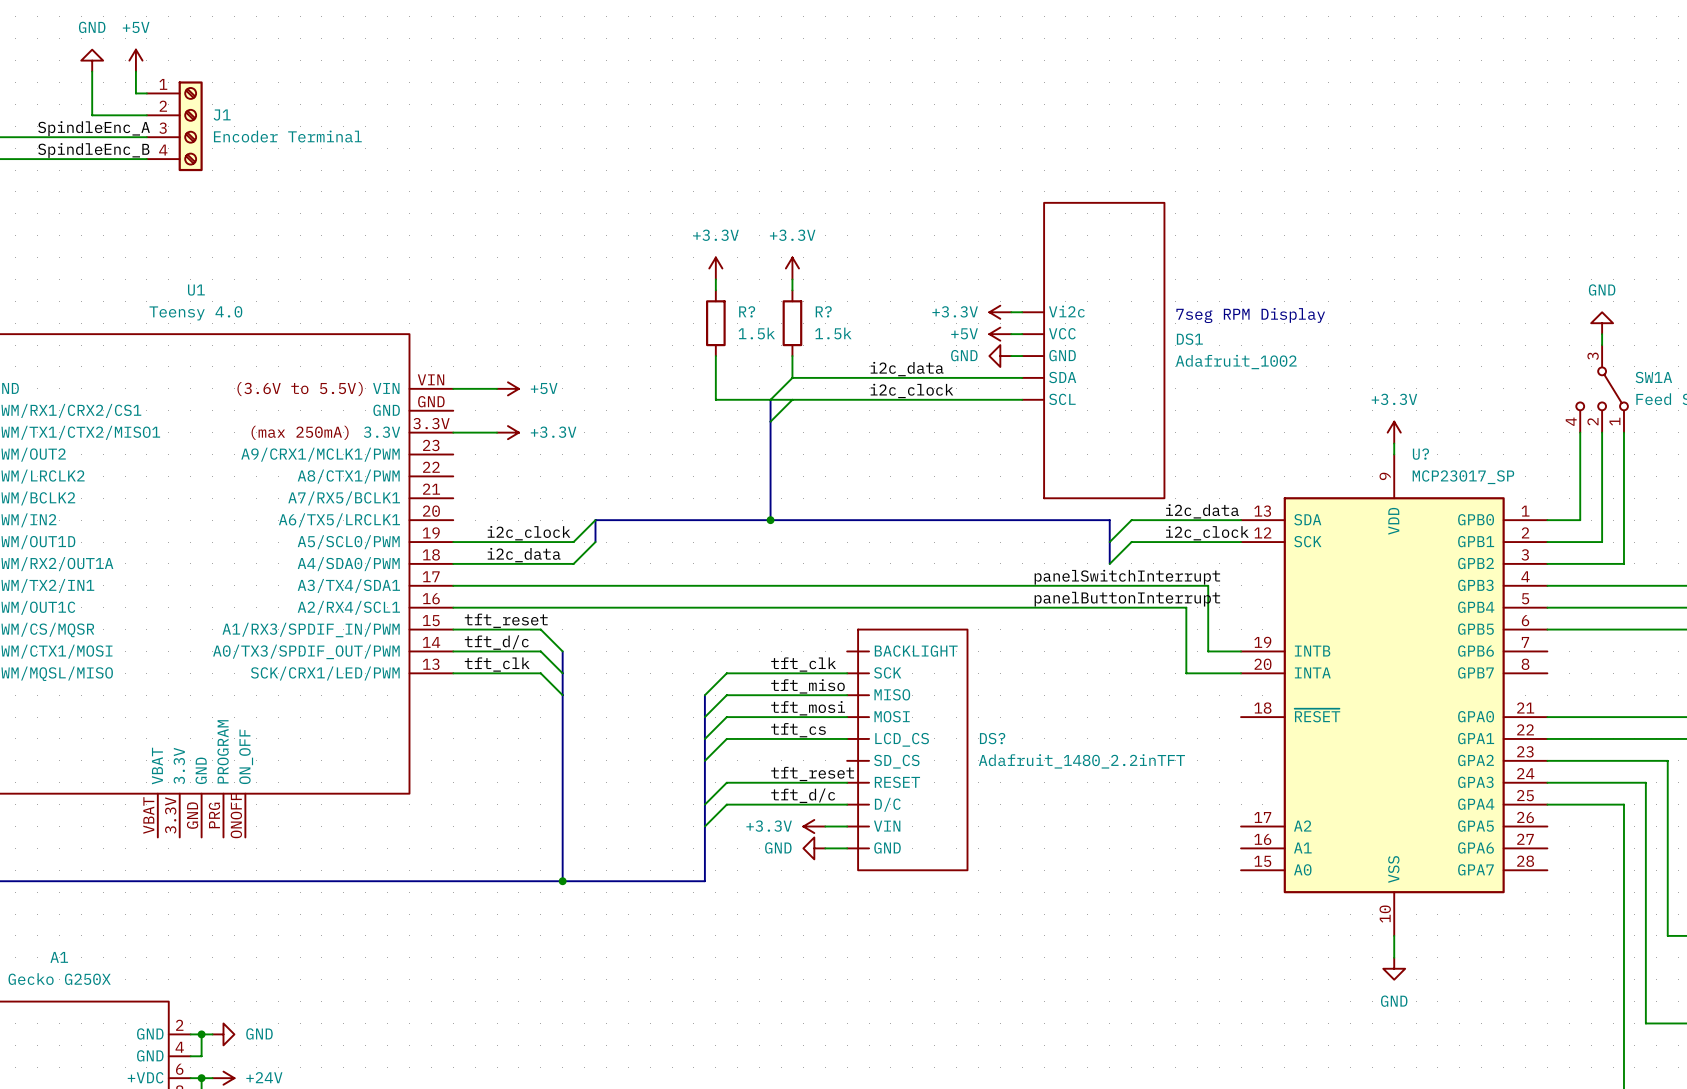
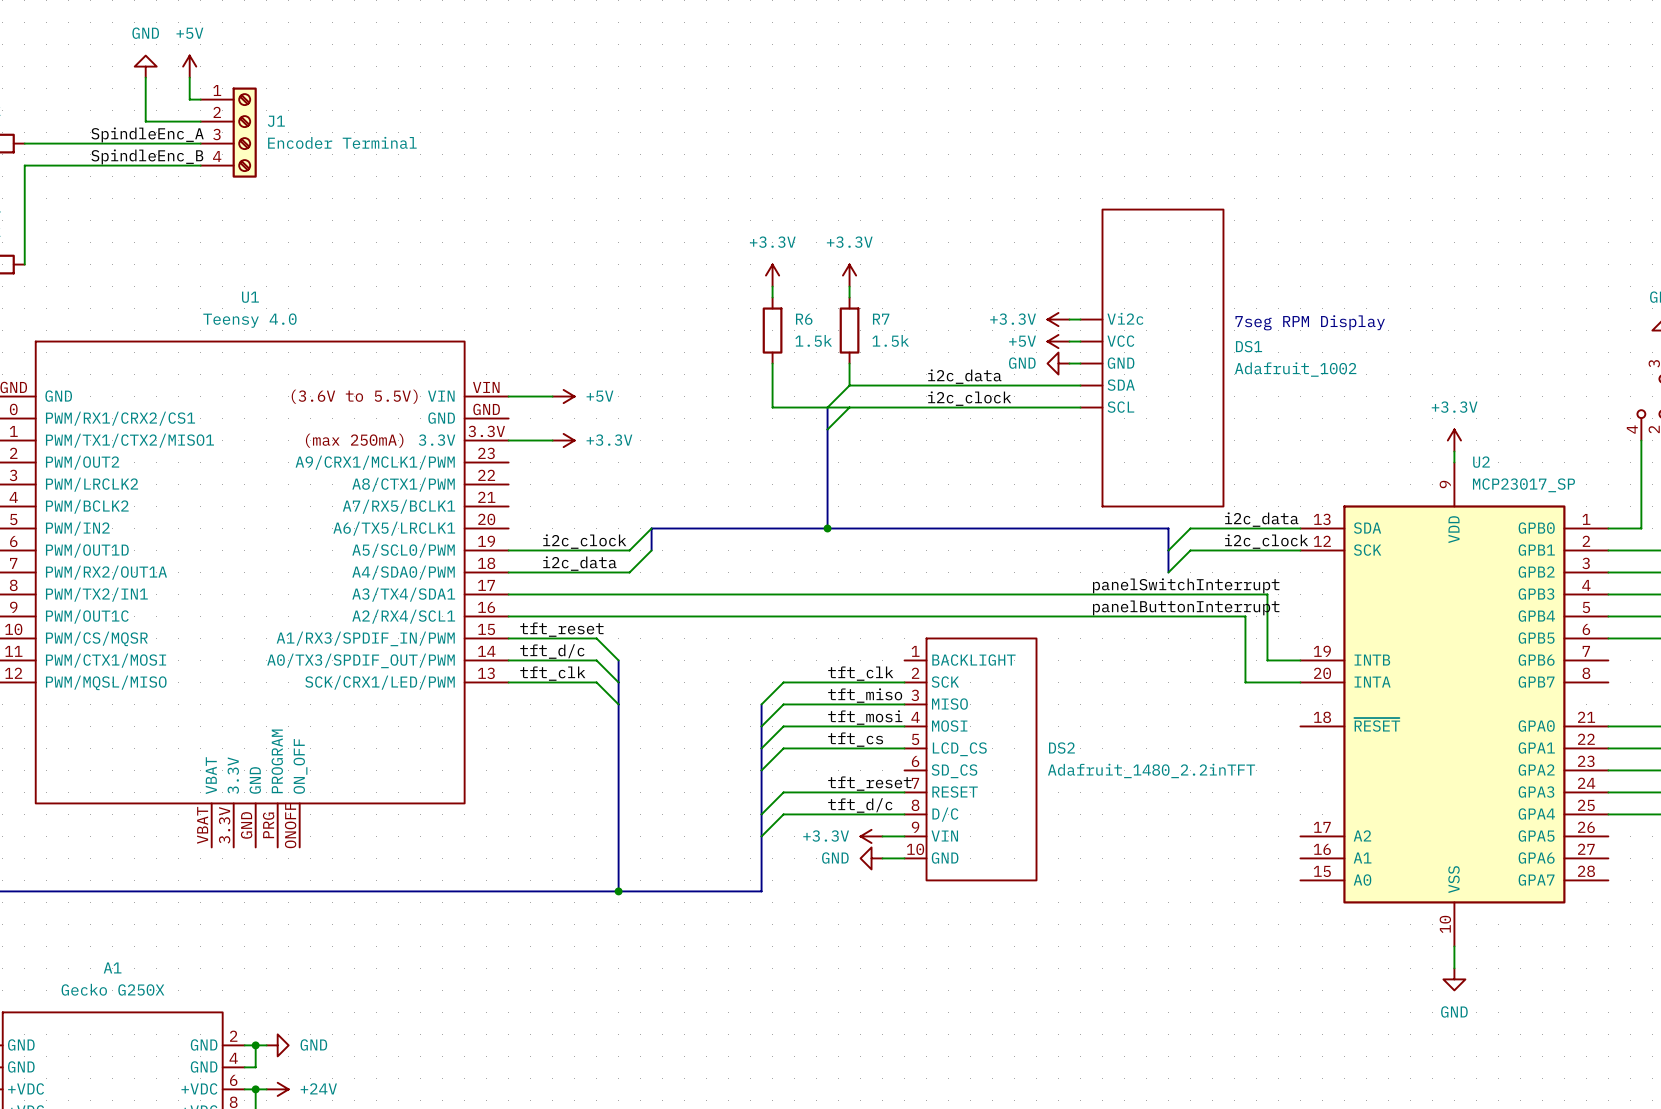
R? name: R? (747, 311) -> R6 (804, 319)
R? name: R? (823, 311) -> R7 (881, 319)
U? name: U? (1420, 454) -> U2 (1481, 462)
DS?: Adafruit_1480_2.2inTFT (907, 749) -> none
DS2: none -> Adafruit_1480_2.2inTFT (970, 759)

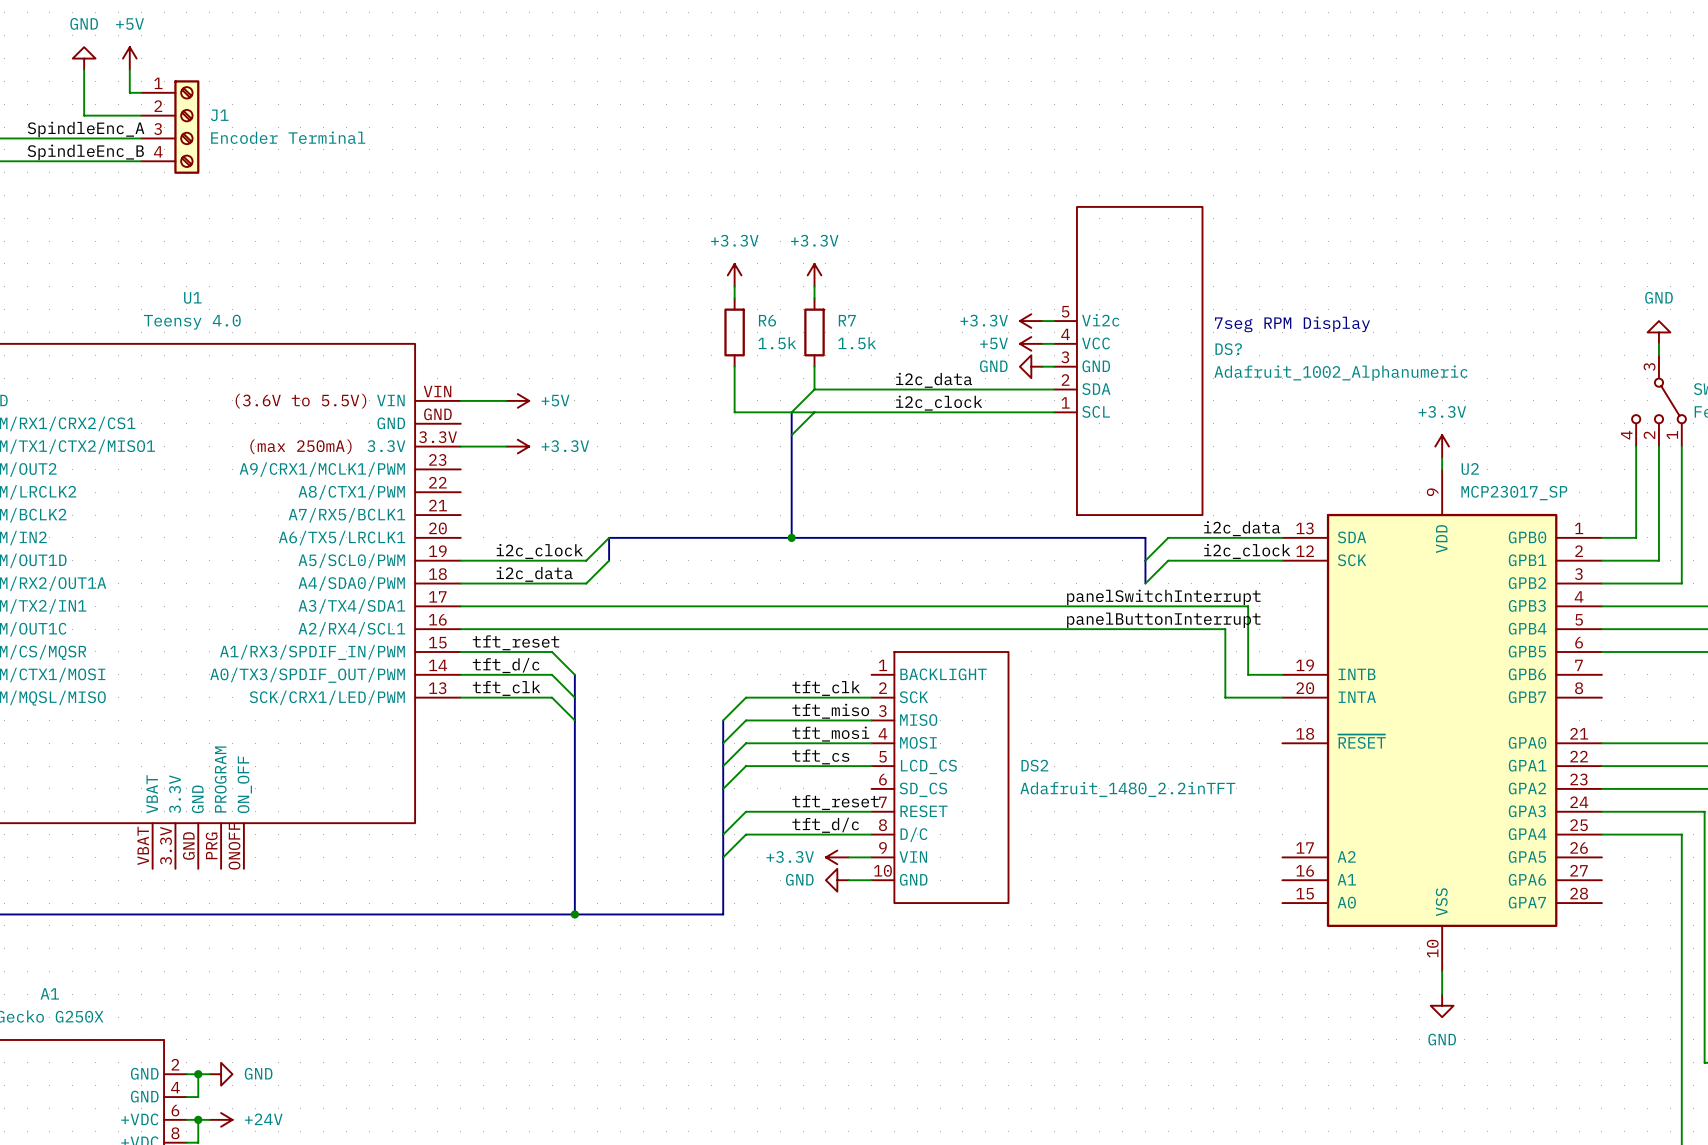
DS1 pin number: none -> 5 (1065, 311)
DS1 pin number: none -> 4 (1065, 334)
DS1 name: DS1 (1249, 346) -> DS? (1228, 349)
DS1 pin number: none -> 3 (1065, 357)
DS1 value: Adafruit_1002 (1295, 369) -> Adafruit_1002_Alphanumeric (1341, 373)
DS1 pin number: none -> 2 (1065, 380)
DS1 pin number: none -> 1 (1065, 402)

